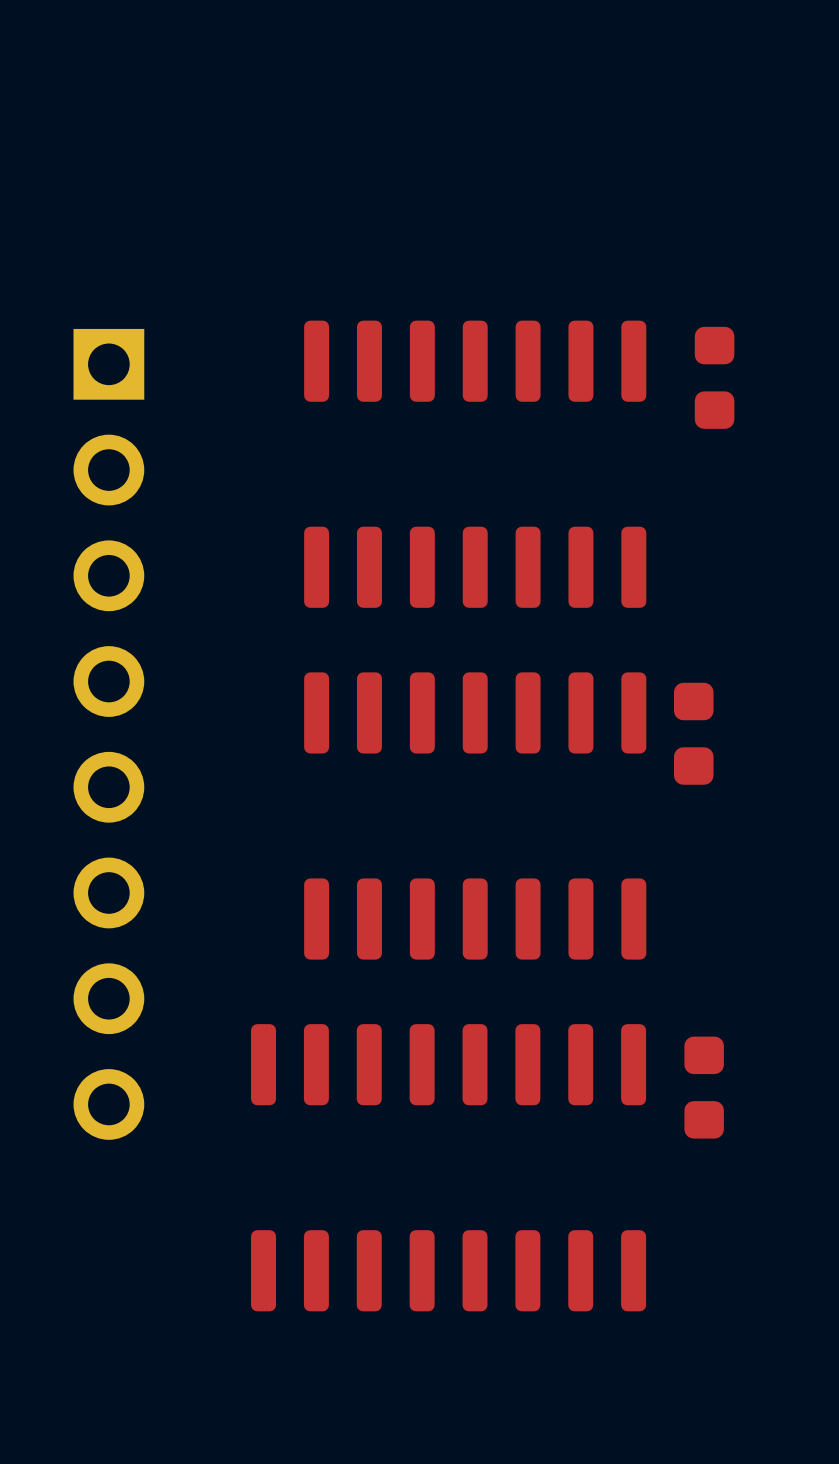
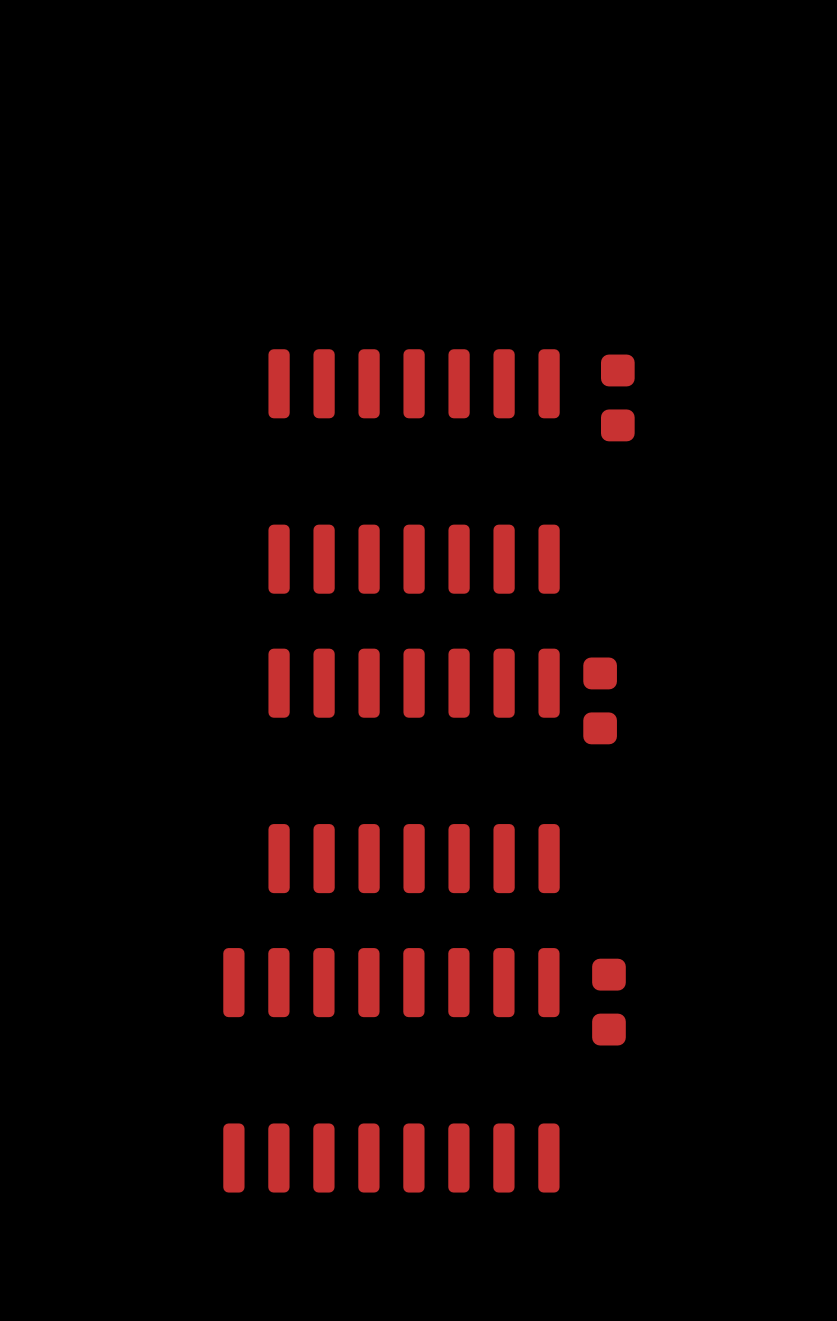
part: (108, 734) -> none

